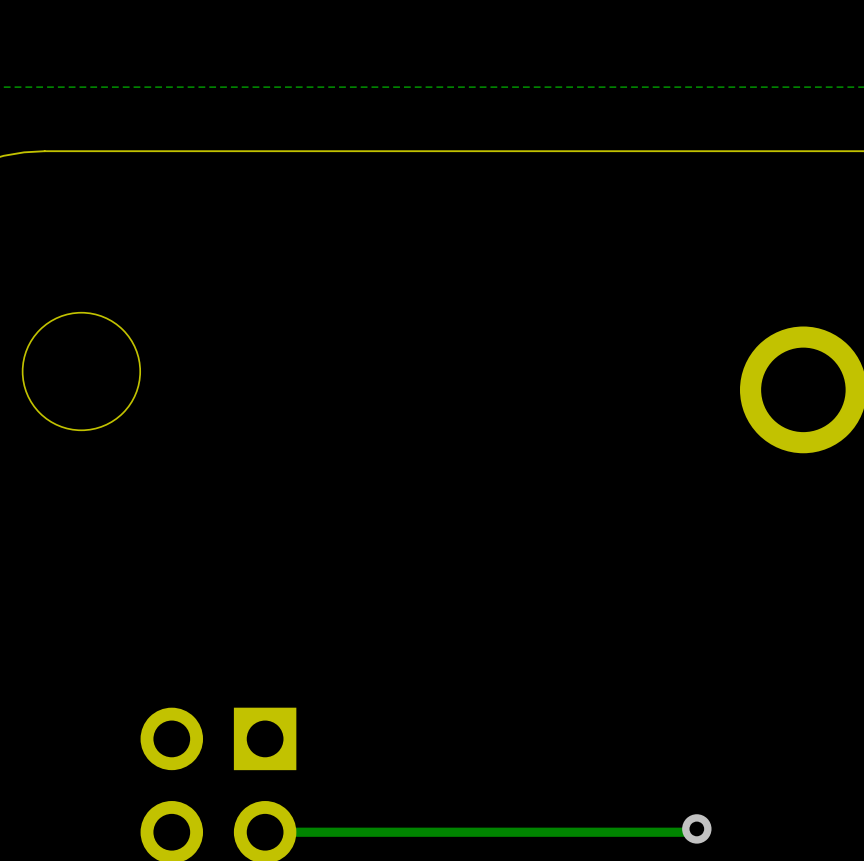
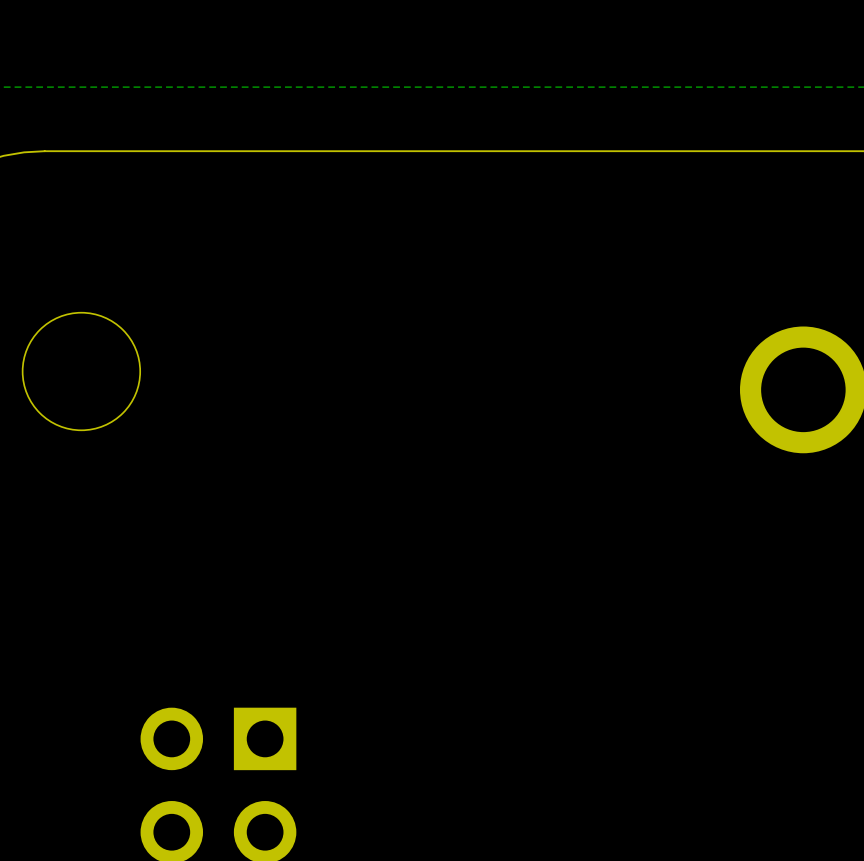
track: (696, 828) (693, 832) (265, 832) -> none
via: (696, 828) -> none

